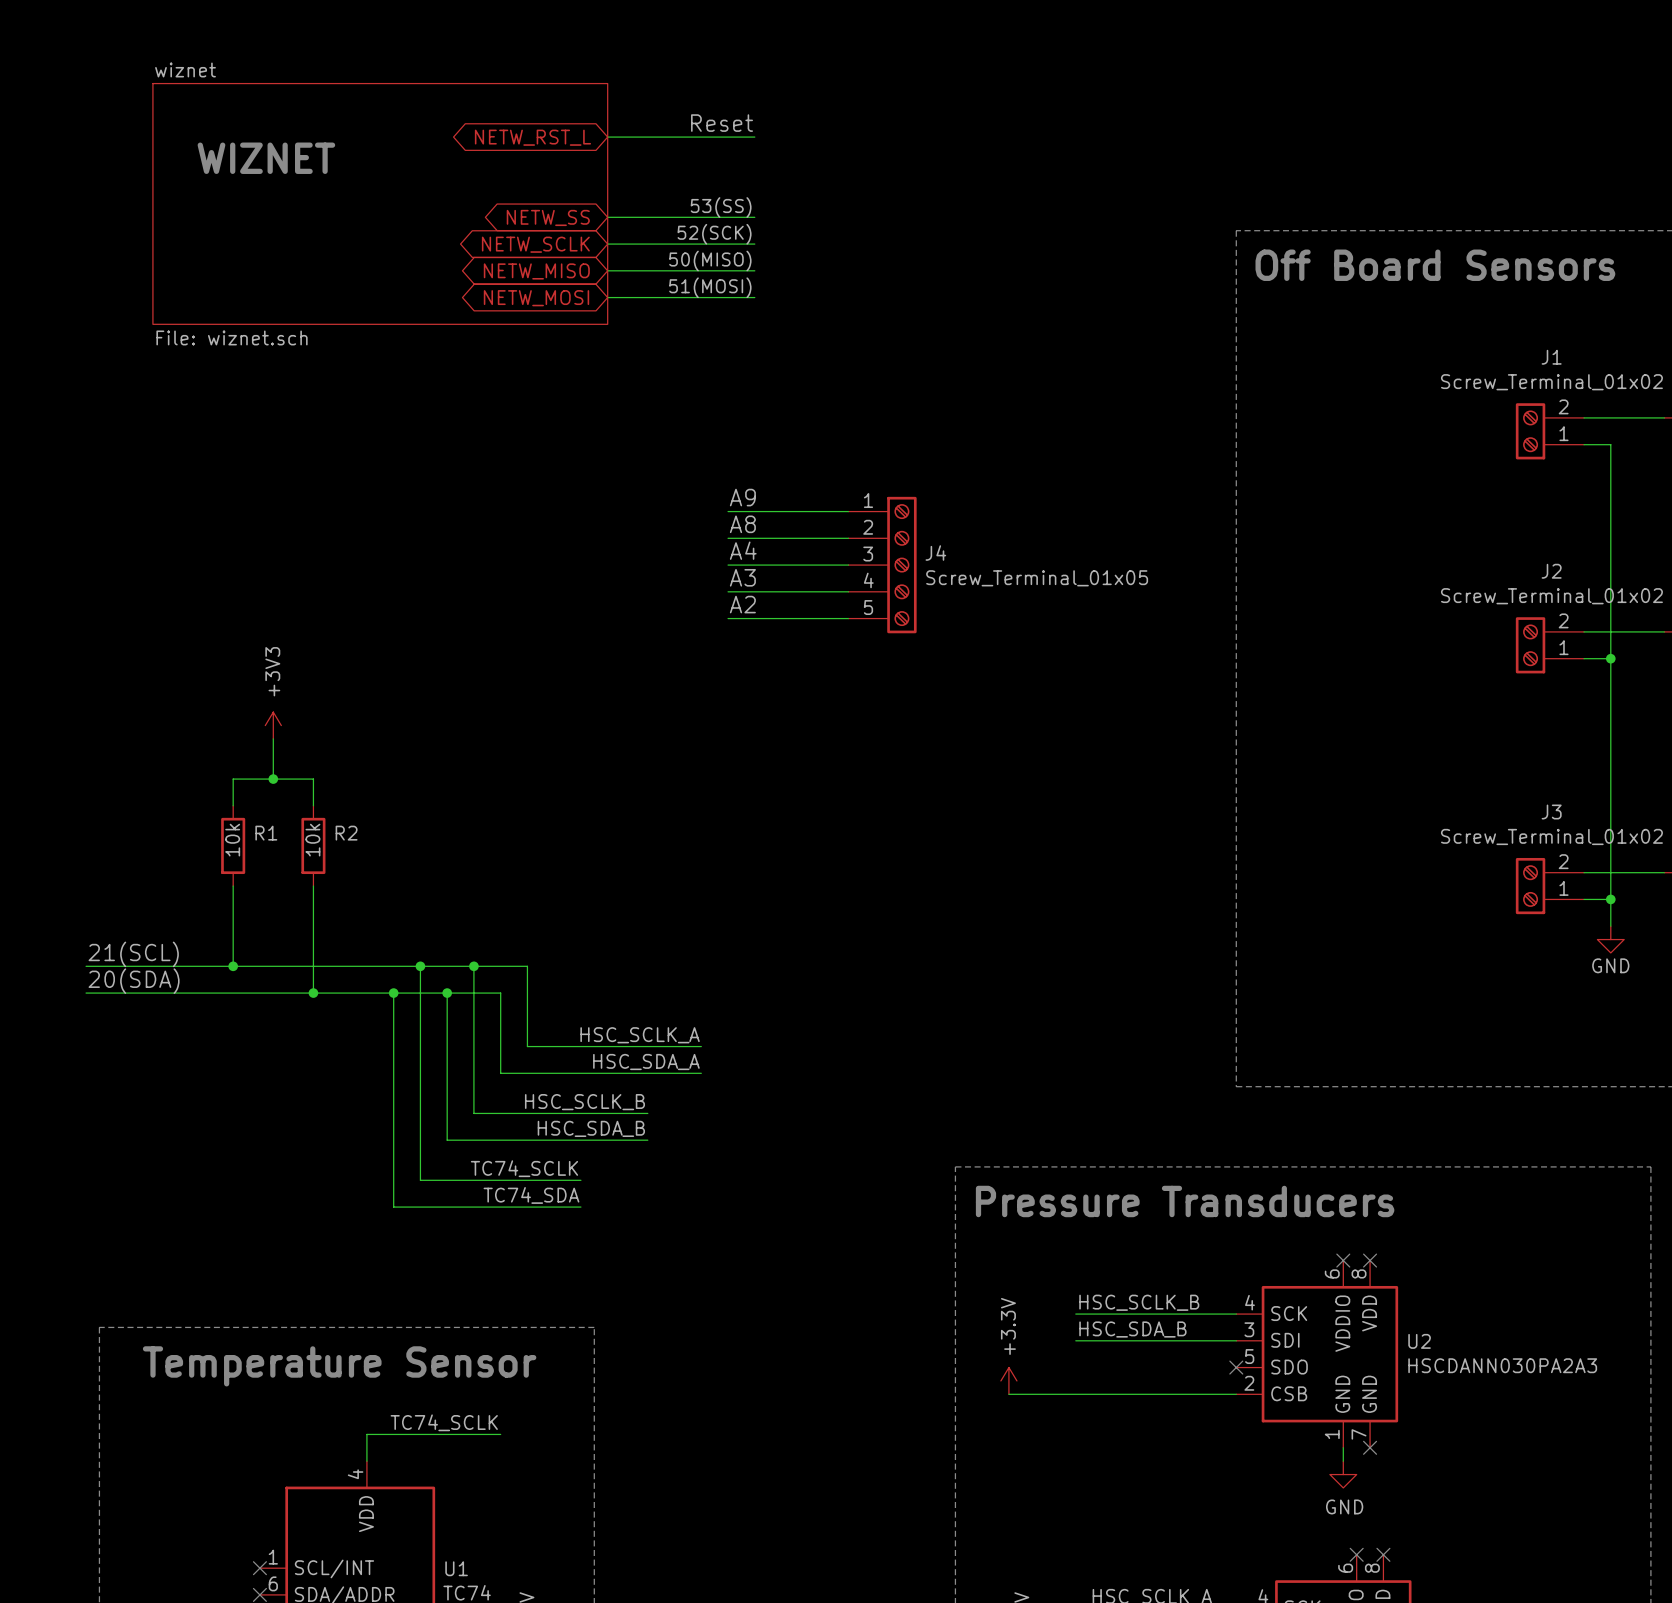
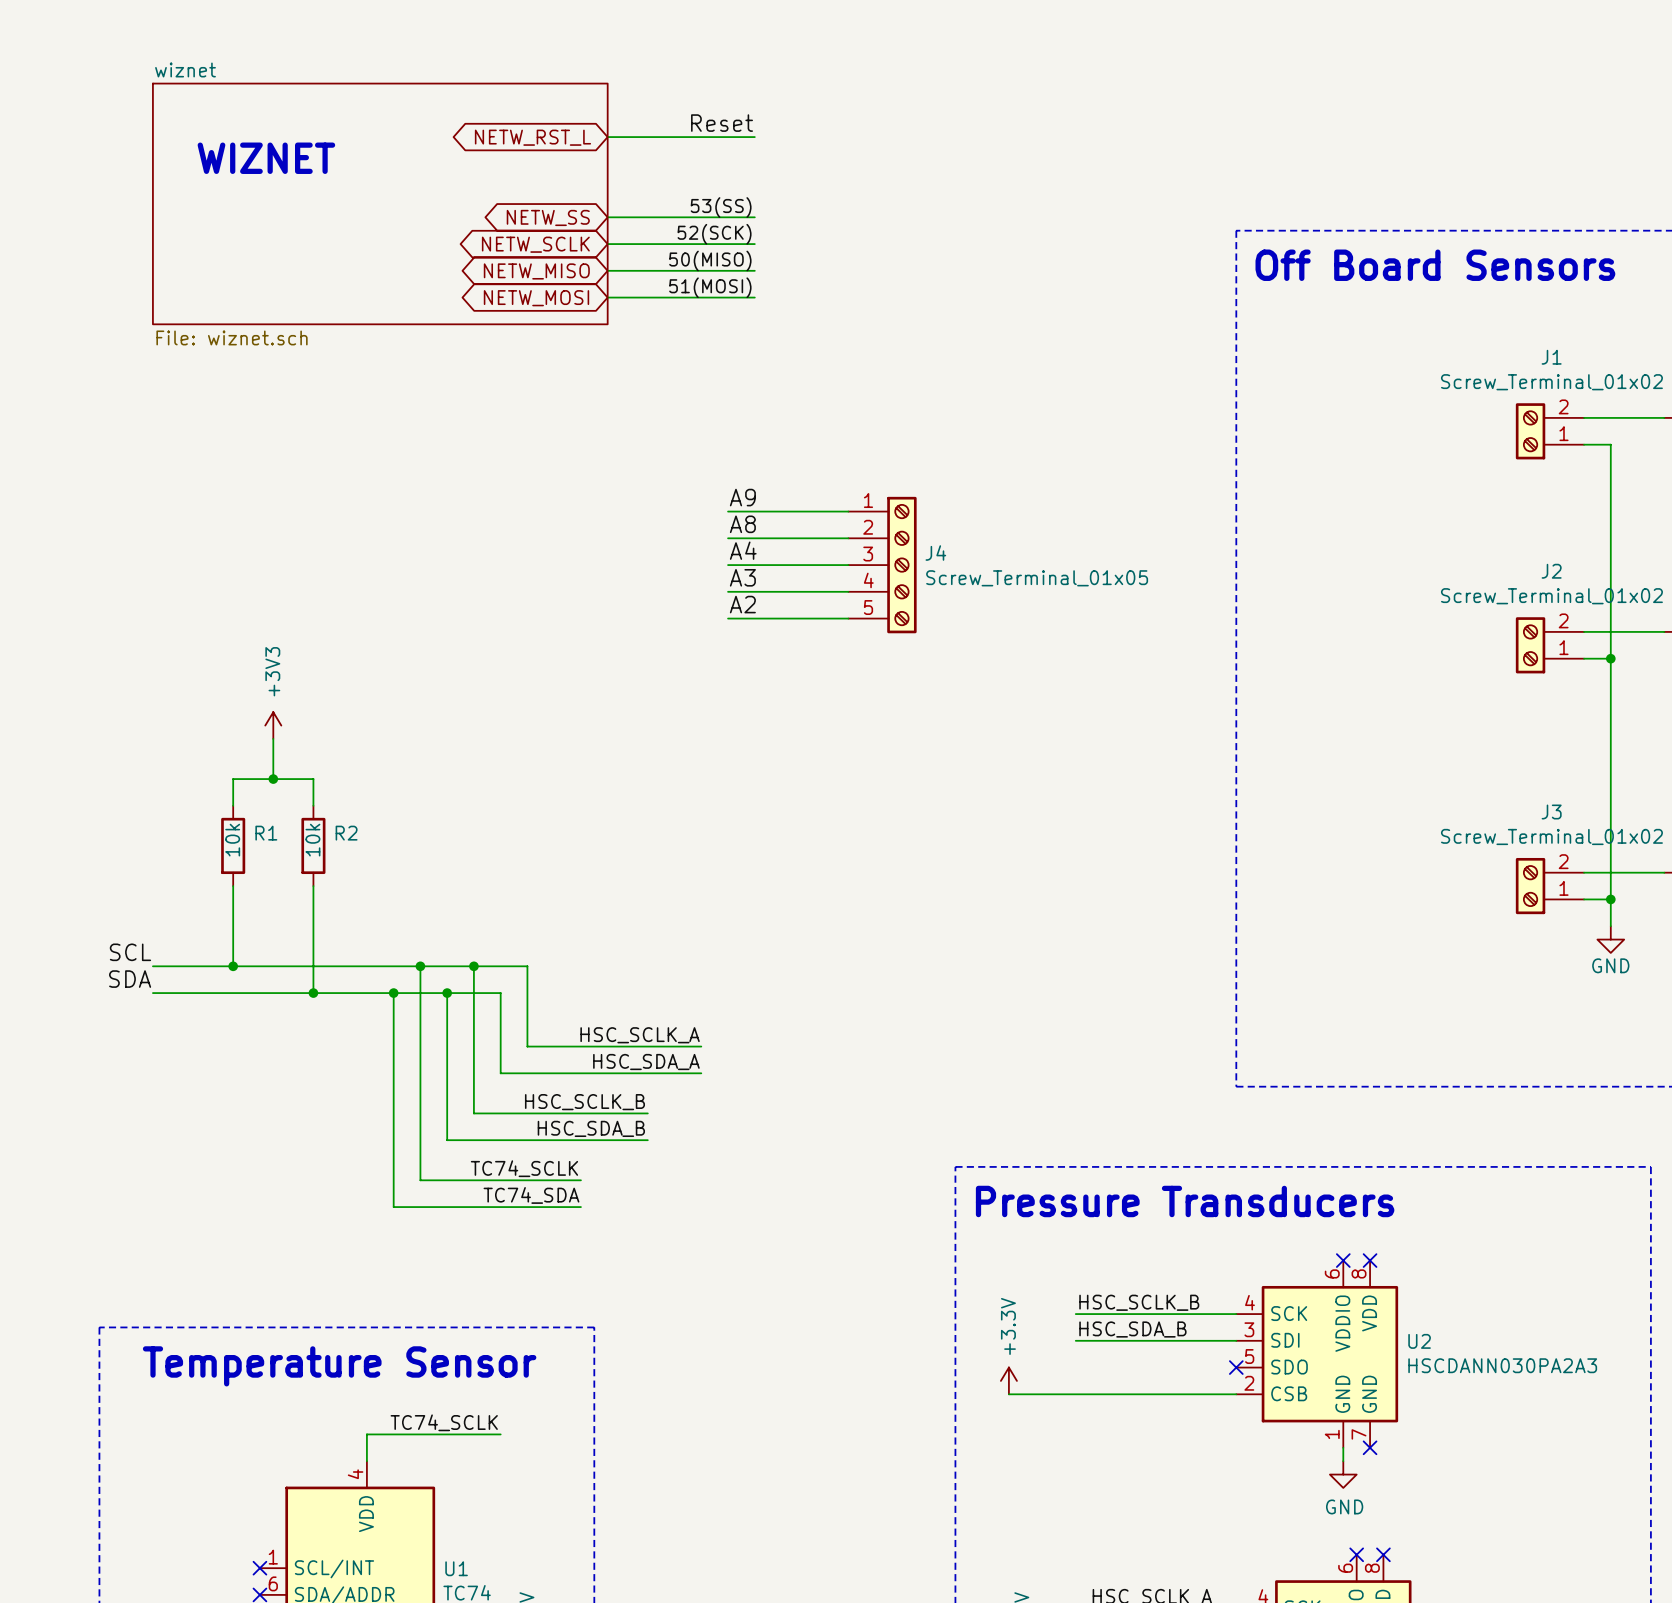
label: none -> SCL (130, 952)
label: 21(SCL) (133, 954) -> none
wire: (86, 966) (152, 966) -> none
label: none -> SDA (130, 979)
label: 20(SDA) (134, 981) -> none
wire: (86, 993) (152, 993) -> none

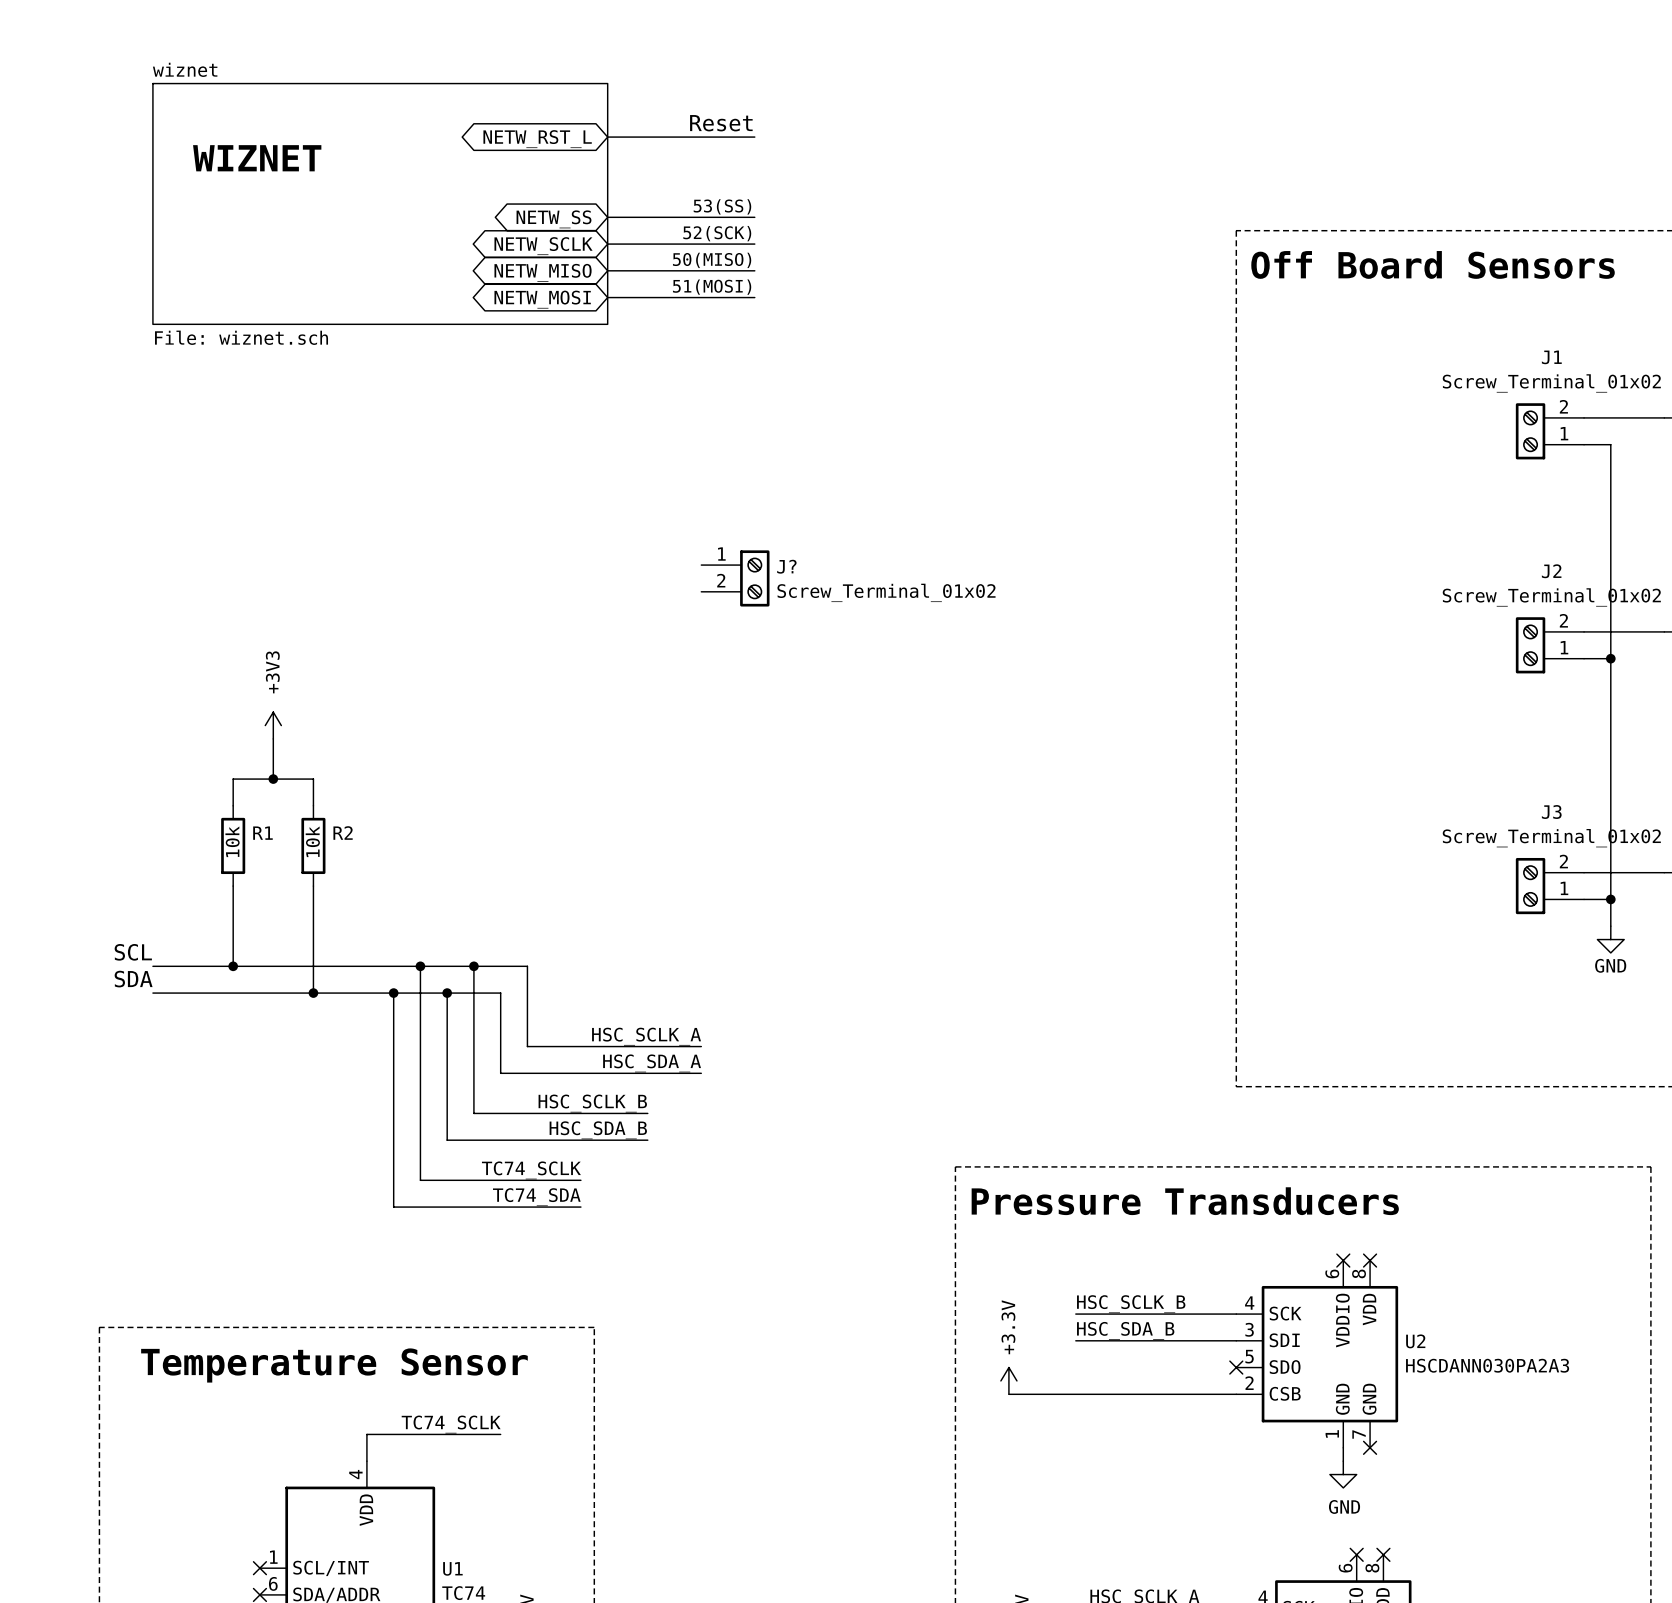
label: A9 (742, 497) -> none
wire: (728, 511) (848, 511) -> none
label: A8 (742, 524) -> none
wire: (728, 538) (848, 538) -> none
label: A4 (743, 550) -> none
wire: (728, 565) (848, 565) -> none
J4: Screw_Terminal_01x05 (882, 565) -> none
label: A3 (742, 577) -> none
J?: none -> Screw_Terminal_01x02 (735, 578)
wire: (728, 591) (848, 591) -> none
label: A2 (742, 604) -> none
wire: (728, 618) (848, 618) -> none

